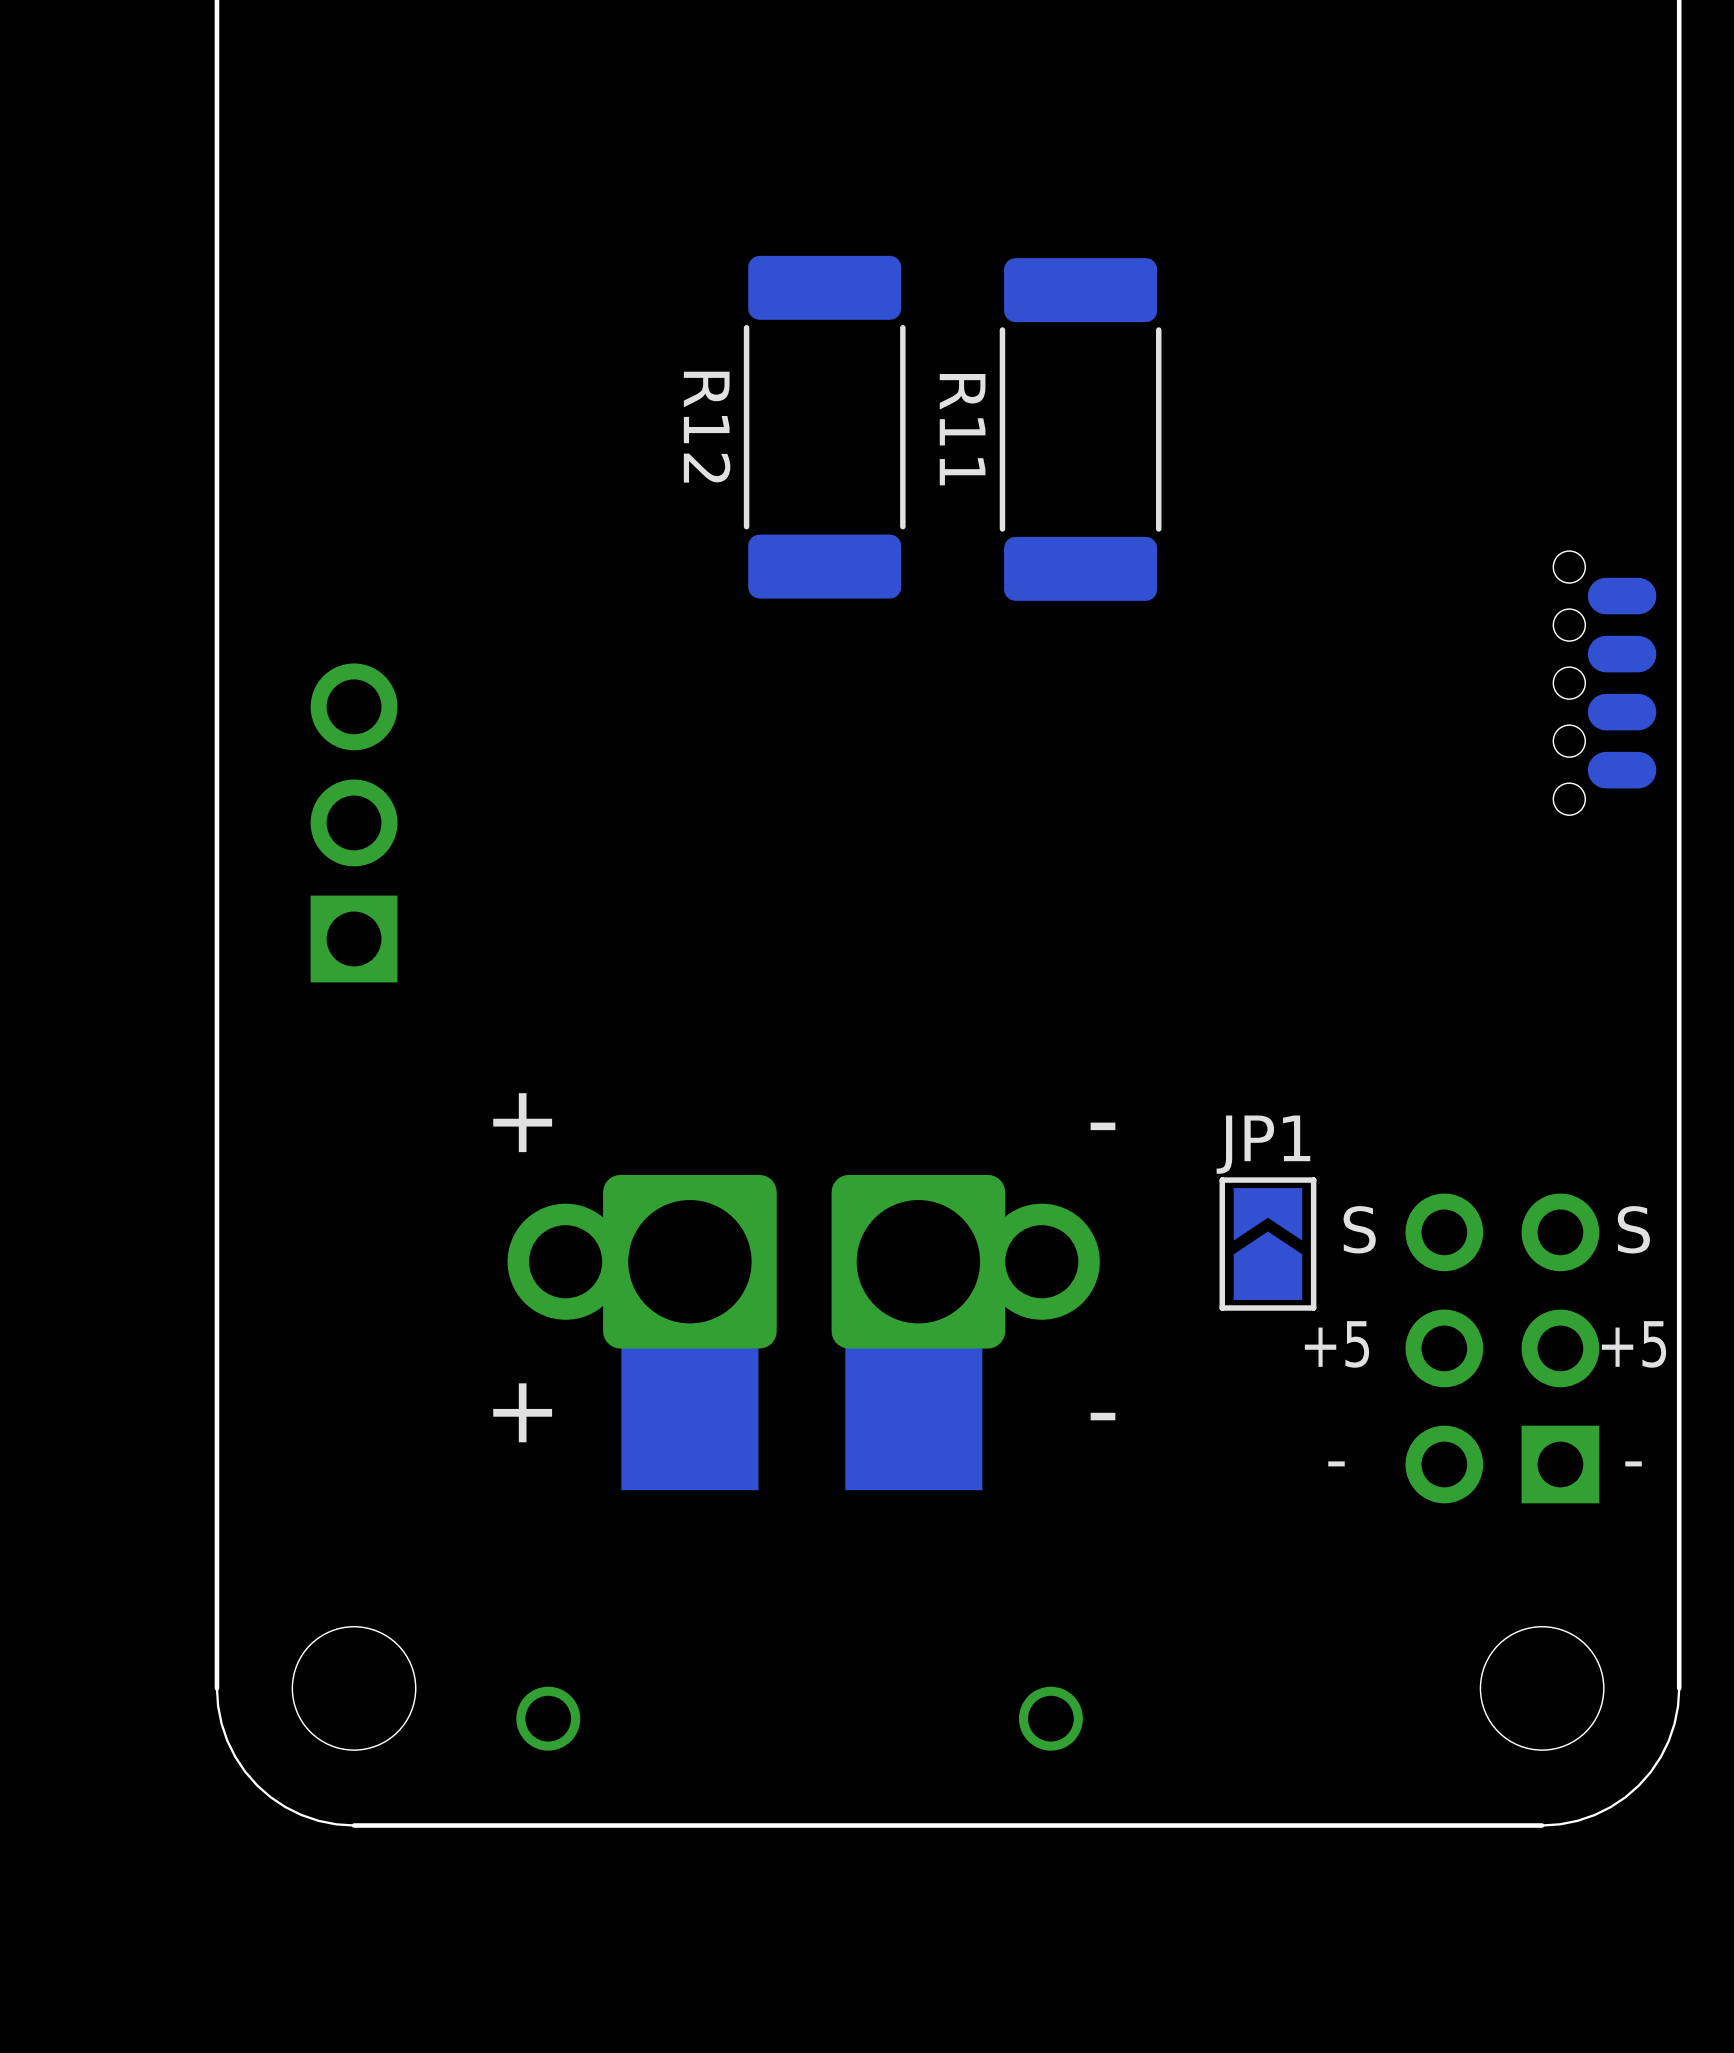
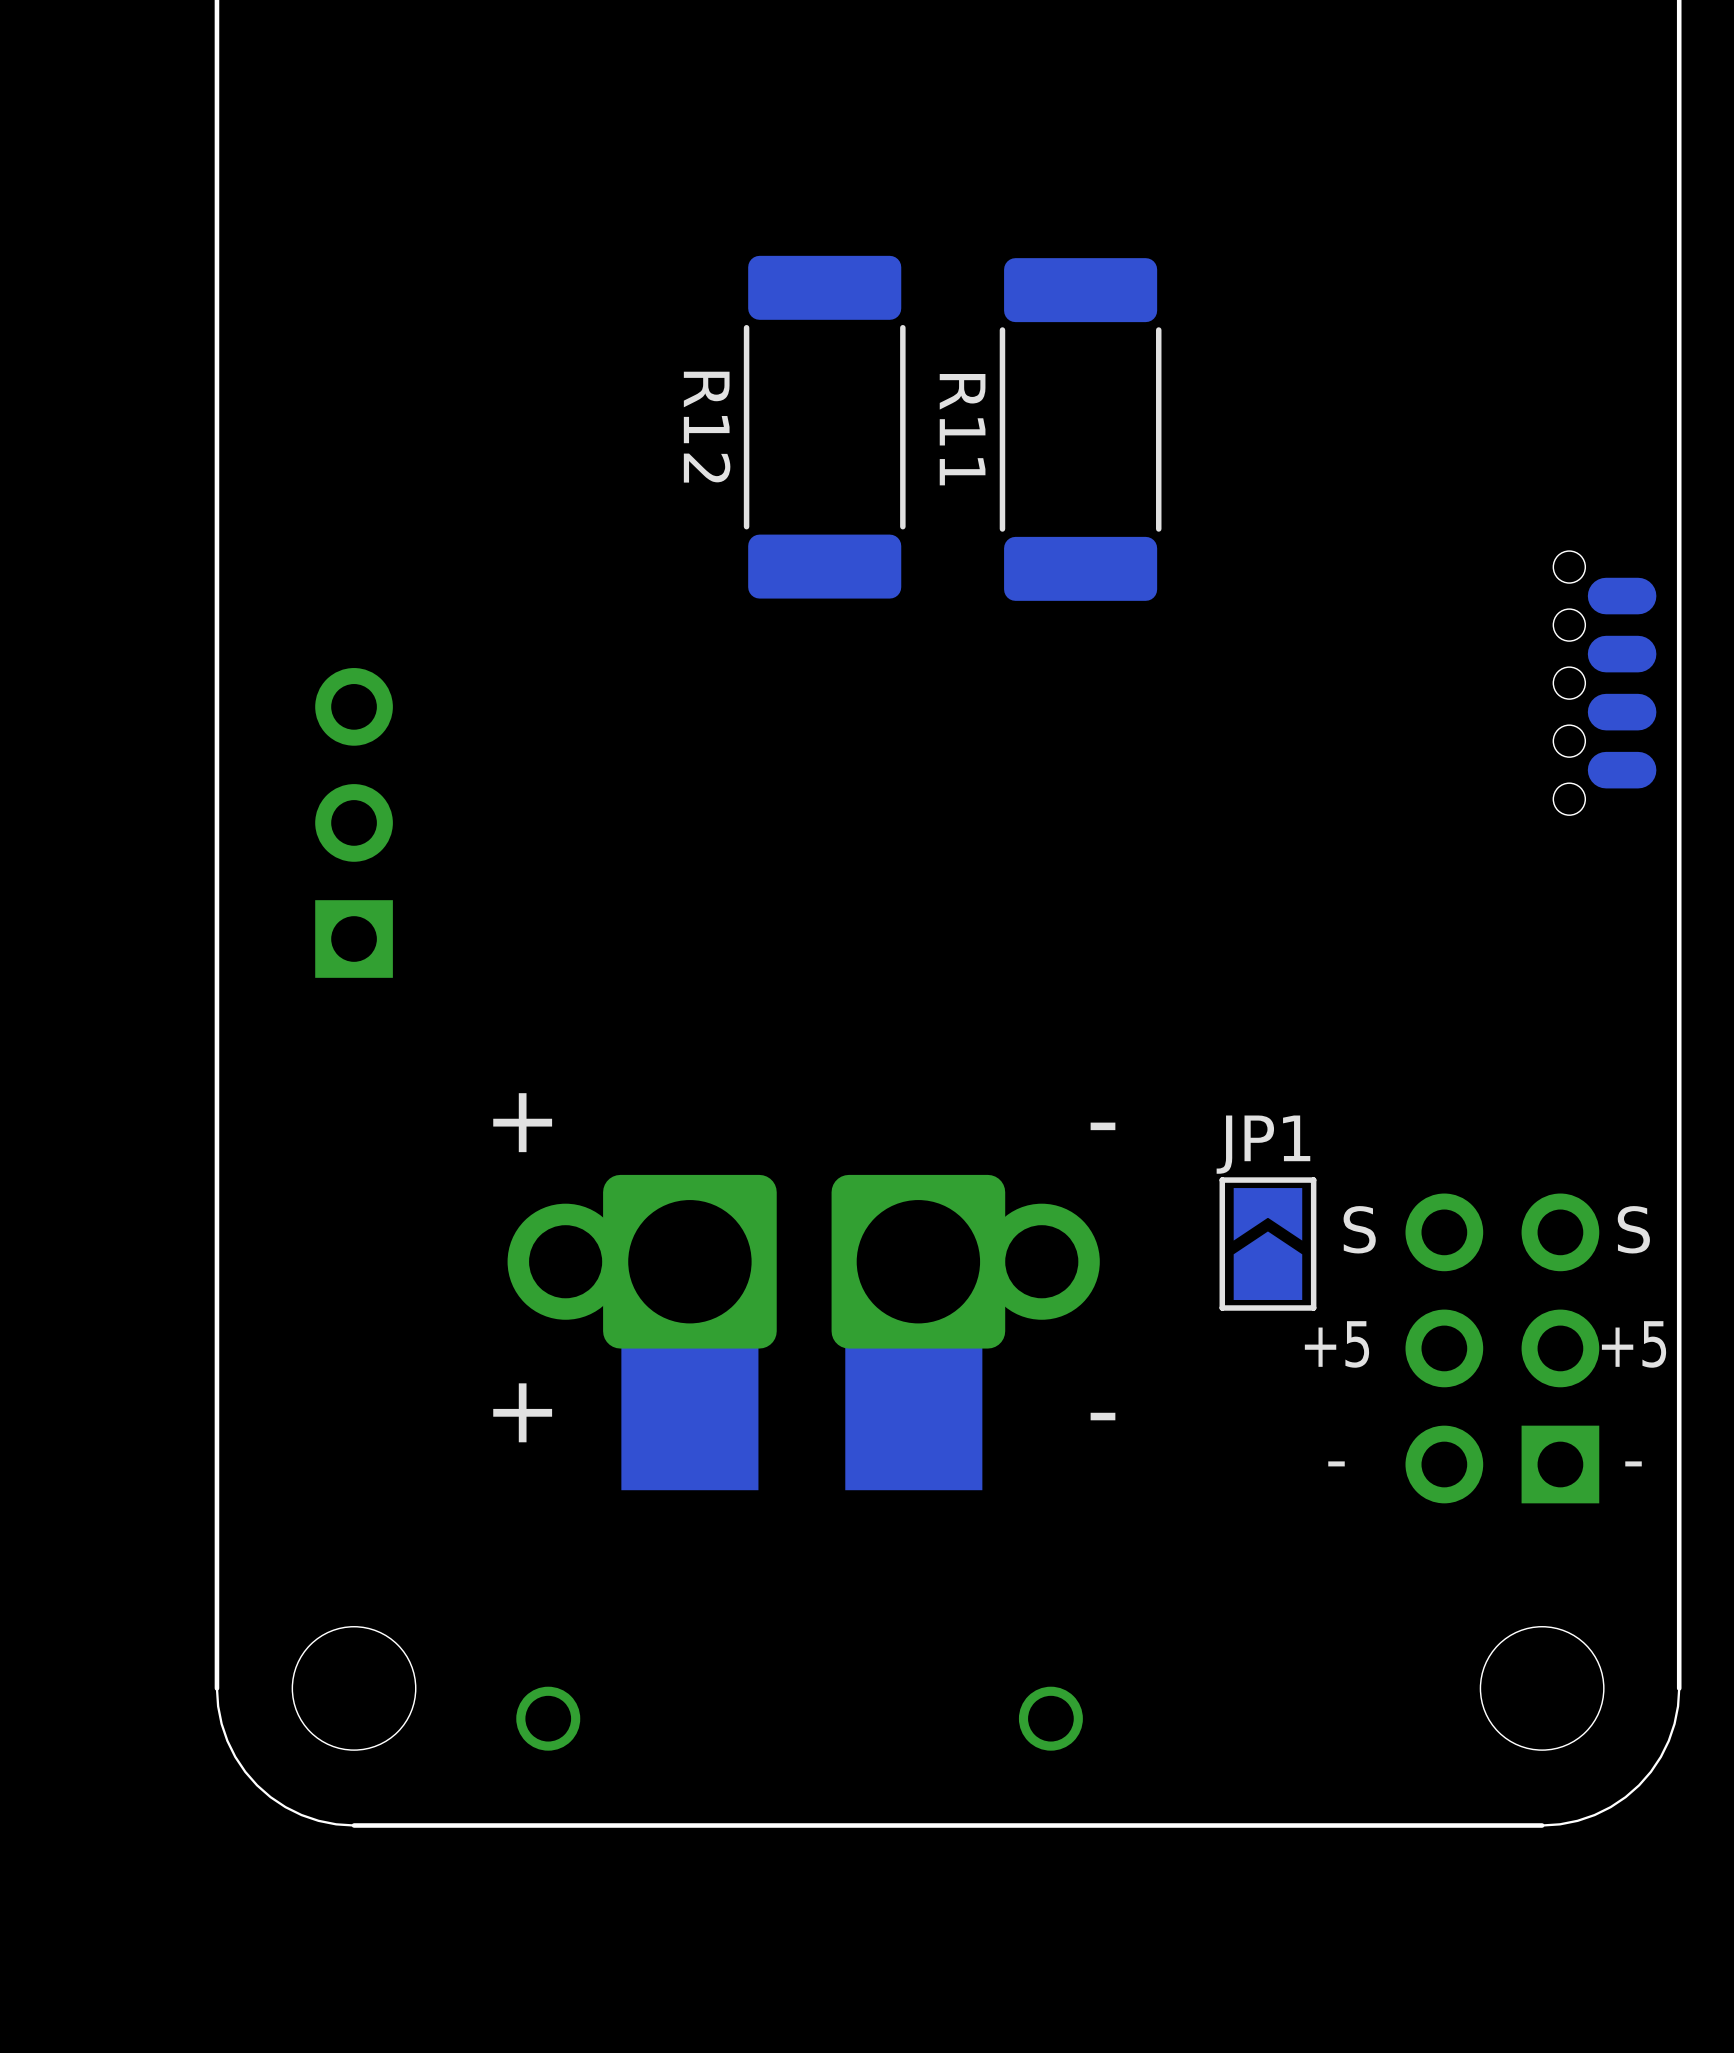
part footprint: [310, 663, 398, 983] -> [315, 668, 393, 978]

